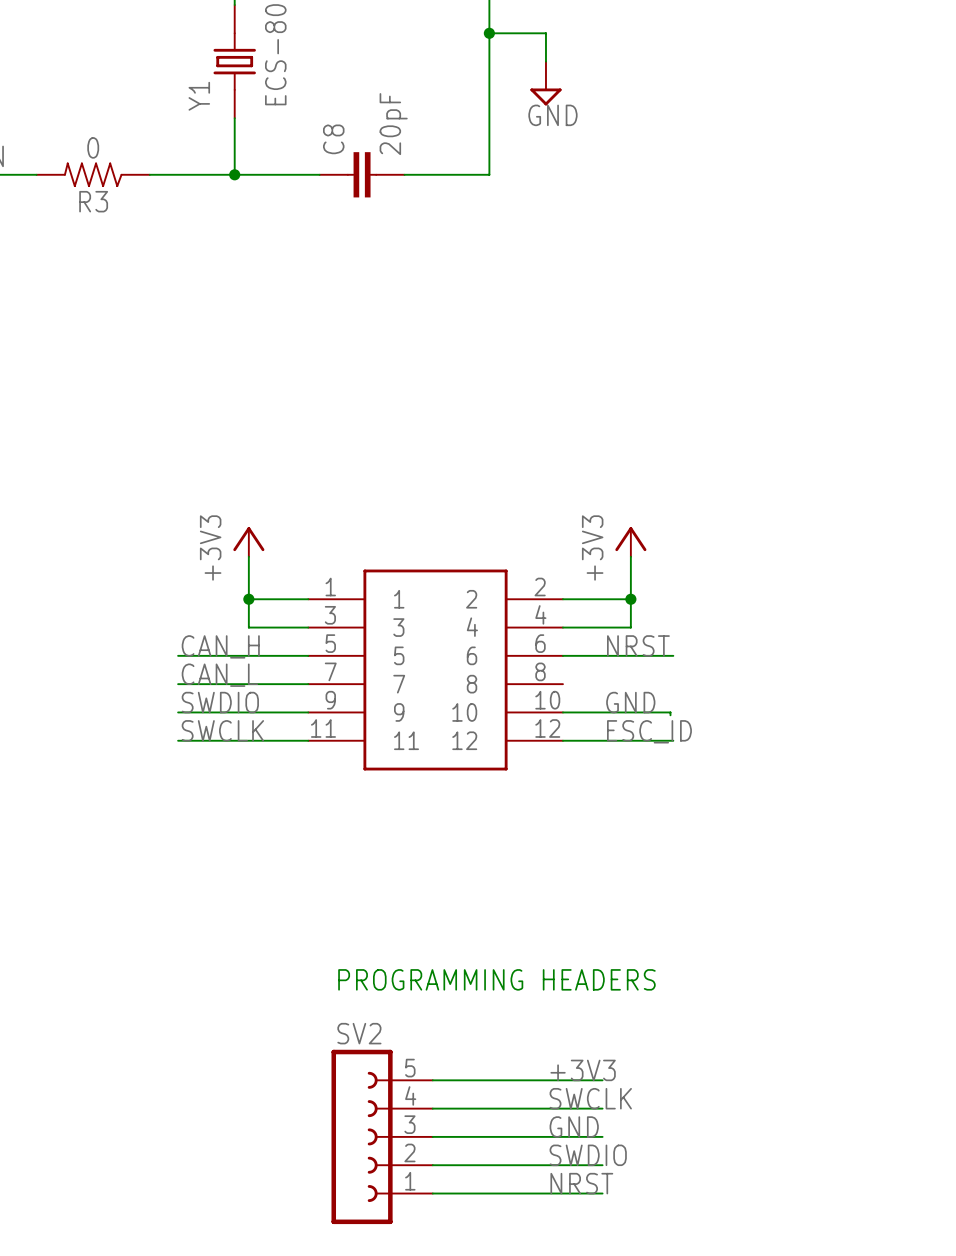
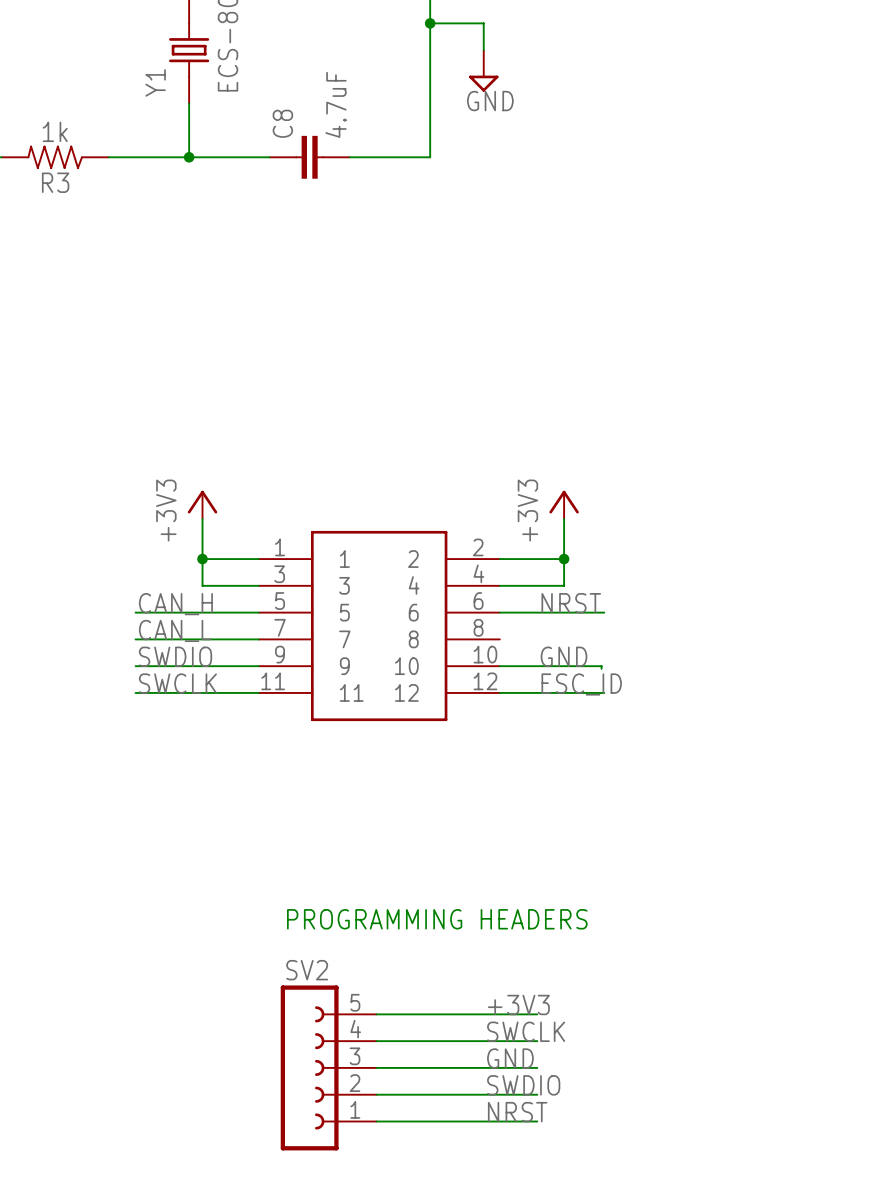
C8 value: 20pF (393, 124) -> 4.7uF (335, 104)
R3 value: 0 (93, 147) -> 1k (55, 131)

